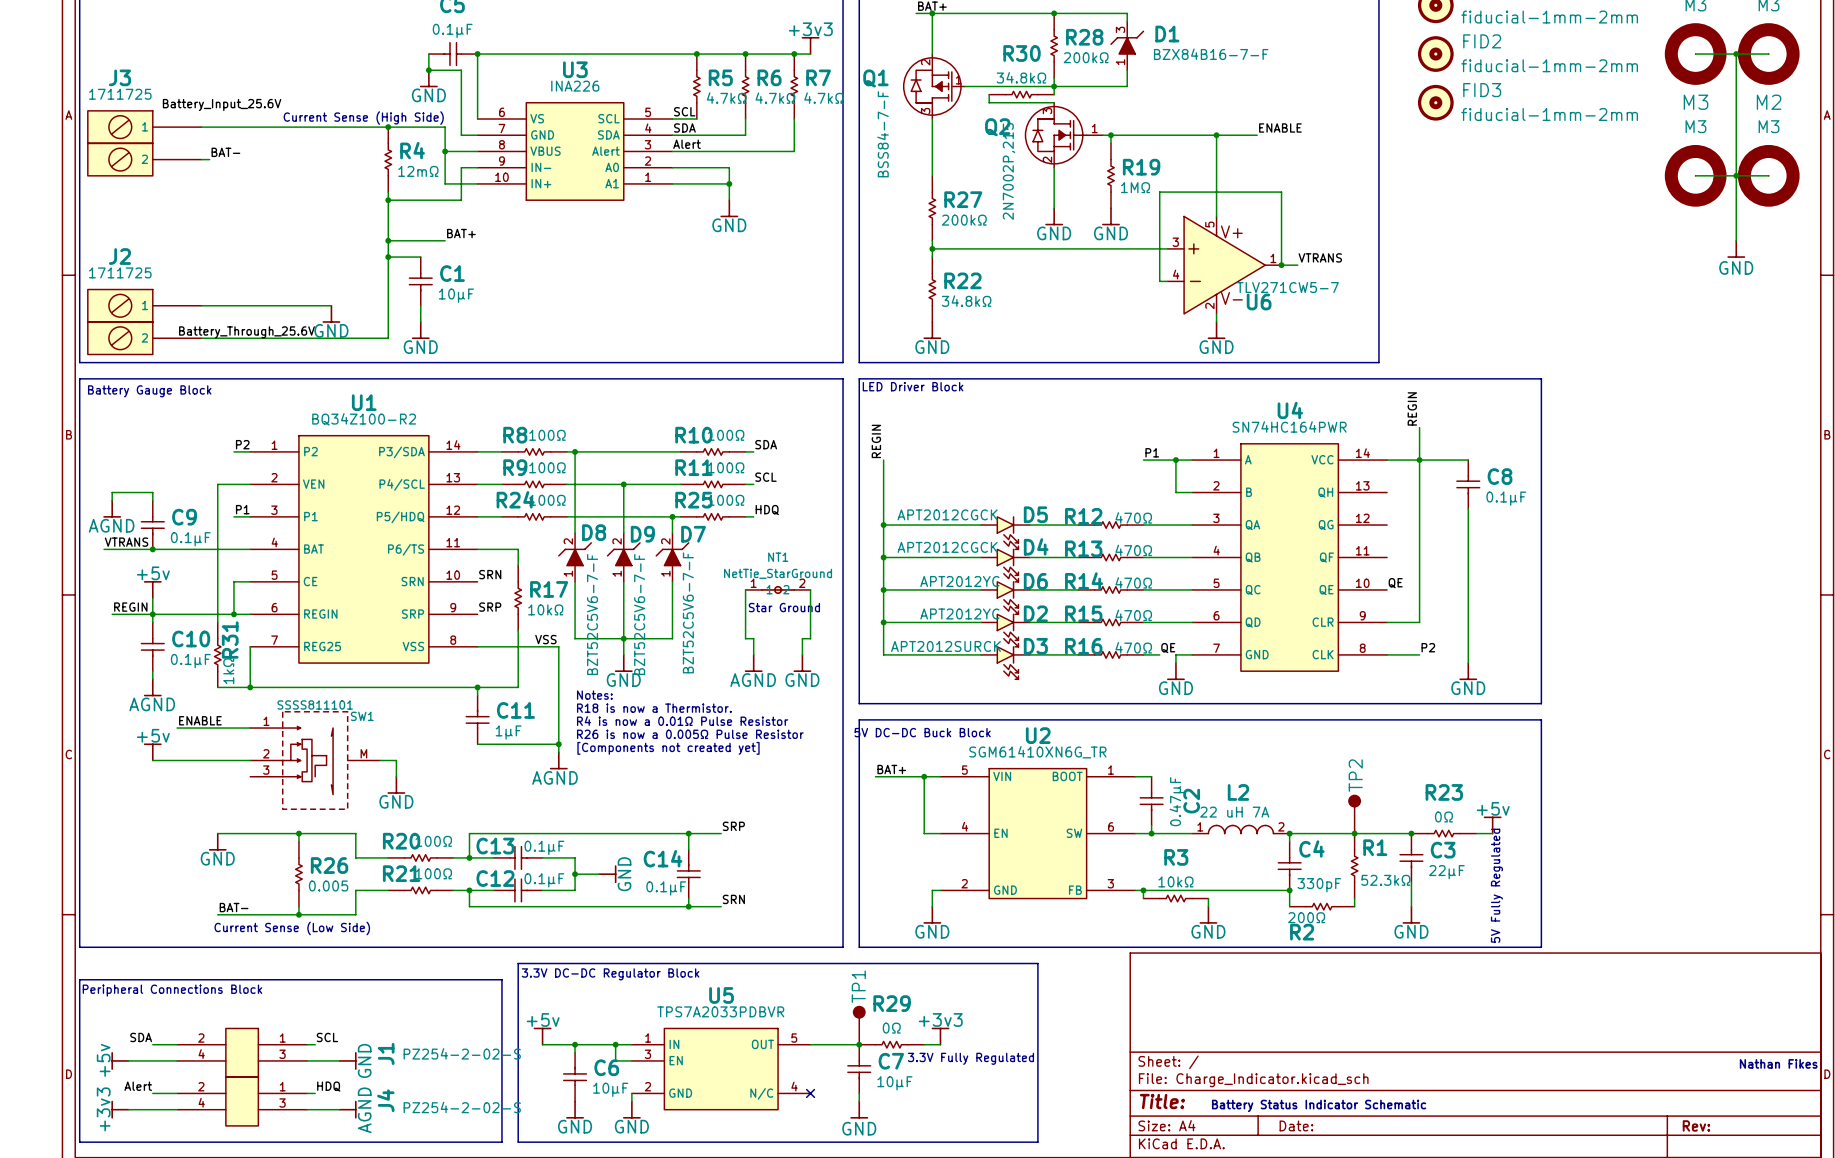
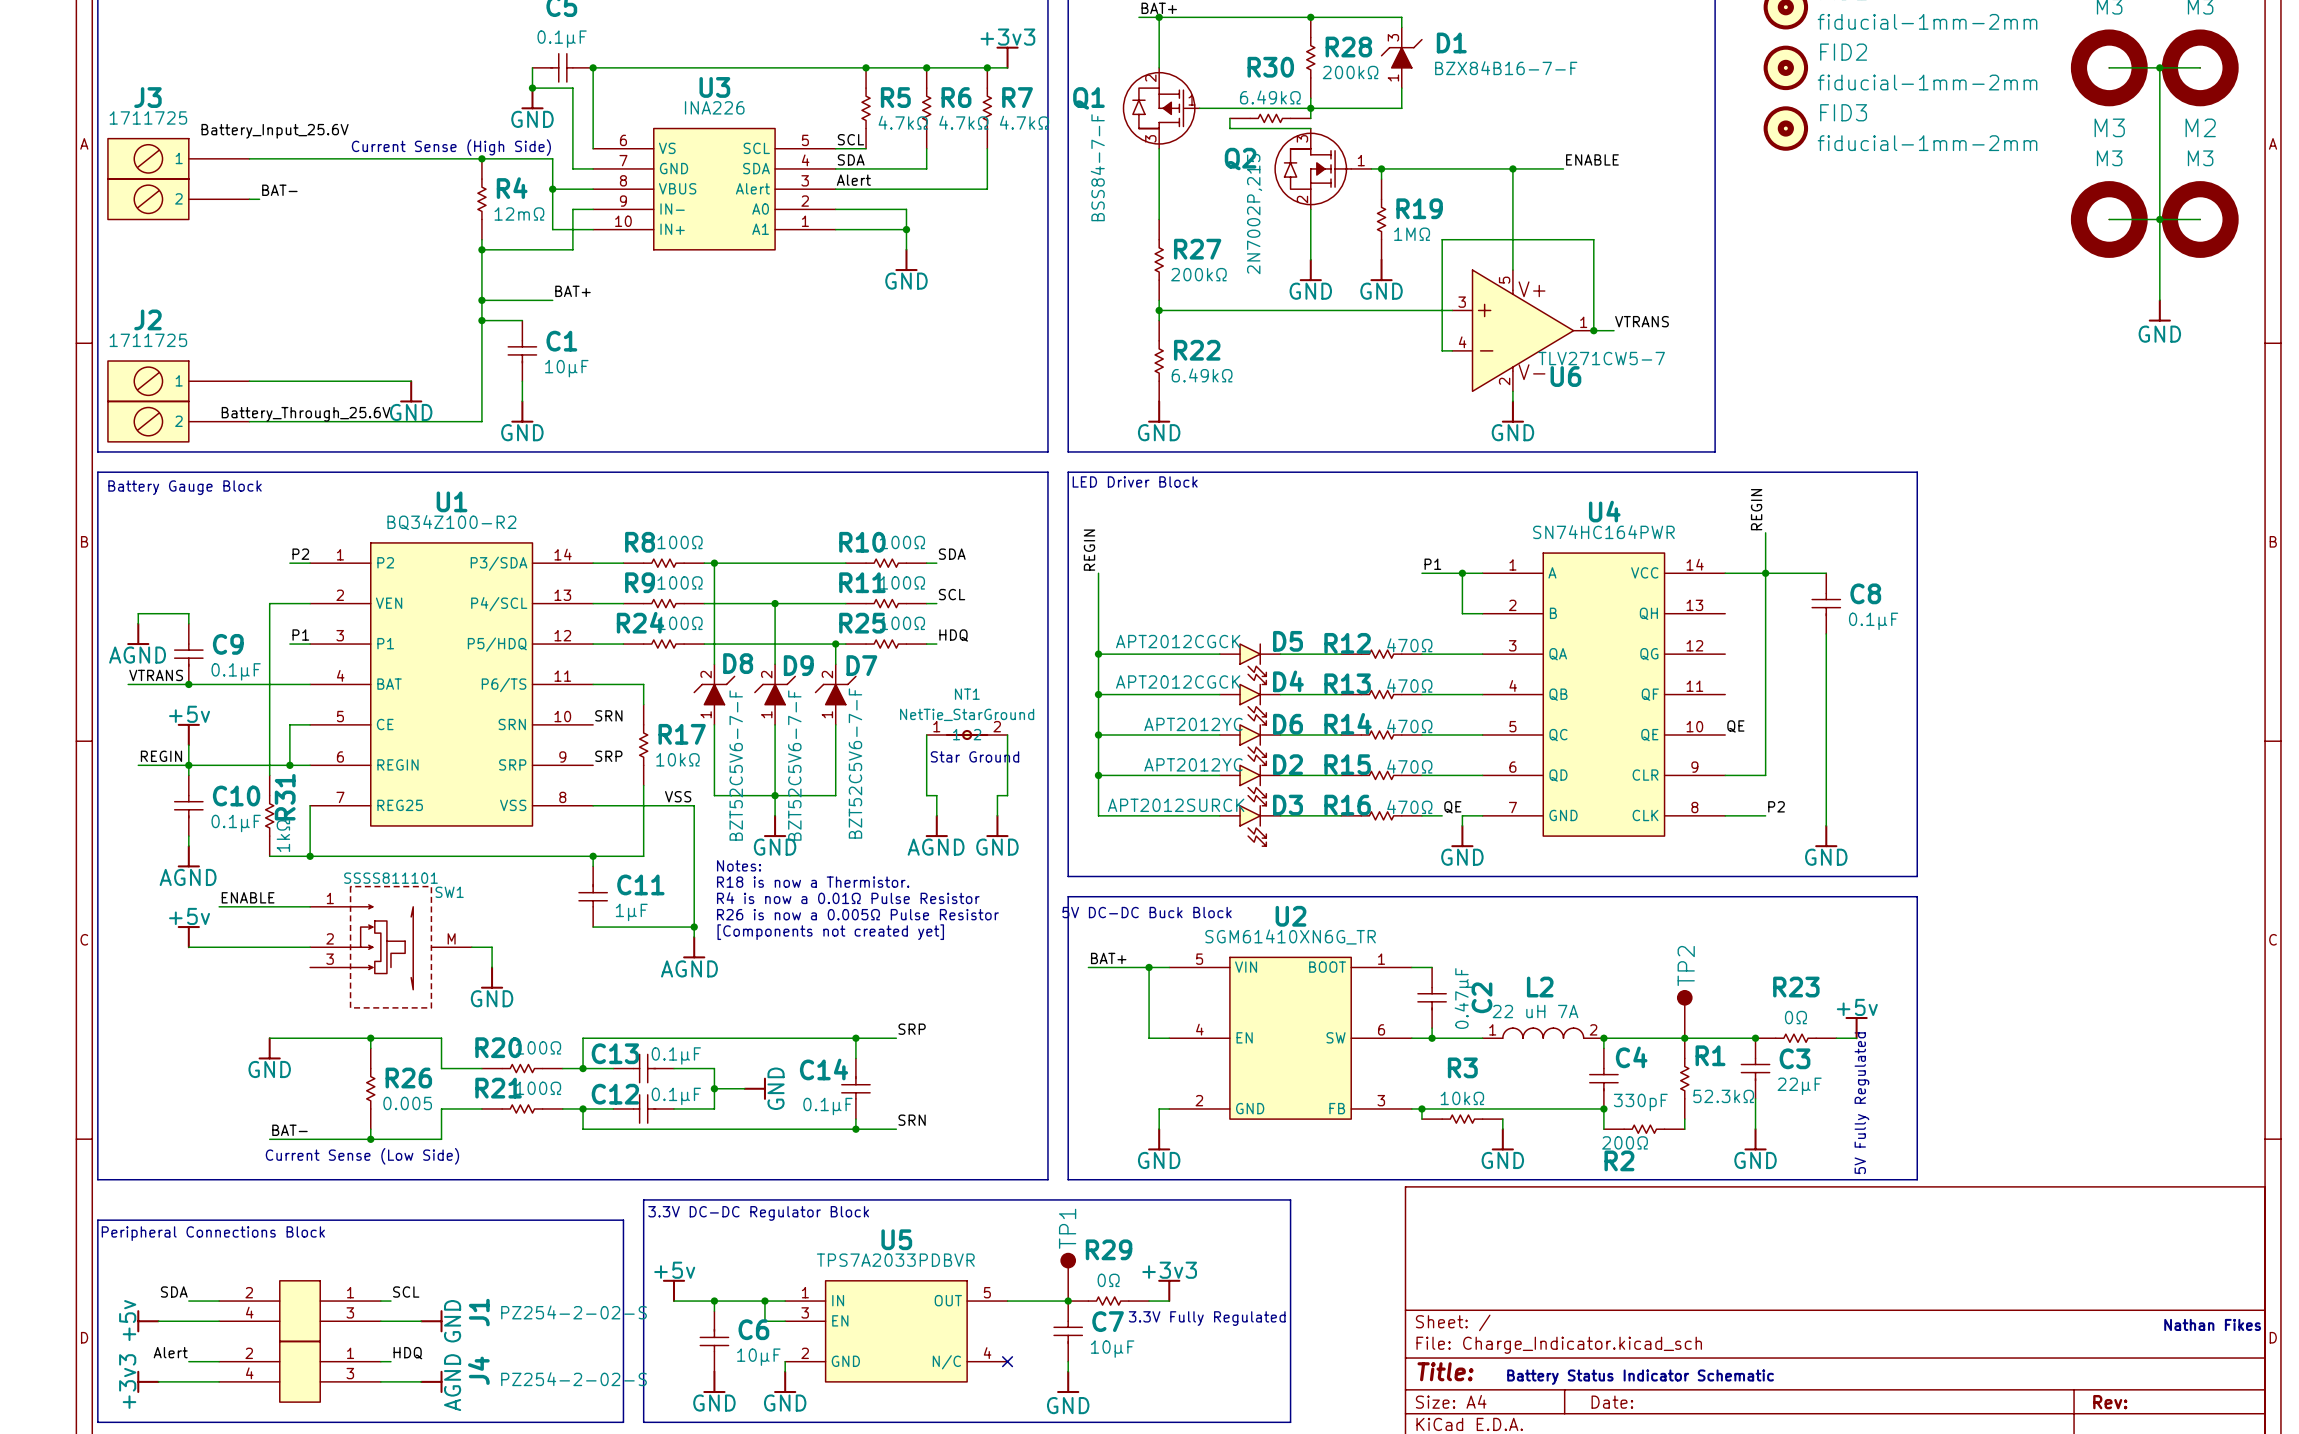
R30 value: 34.8kΩ (1021, 77) -> 6.49kΩ (1270, 97)
R22 value: 34.8kΩ (966, 301) -> 6.49kΩ (1202, 375)

